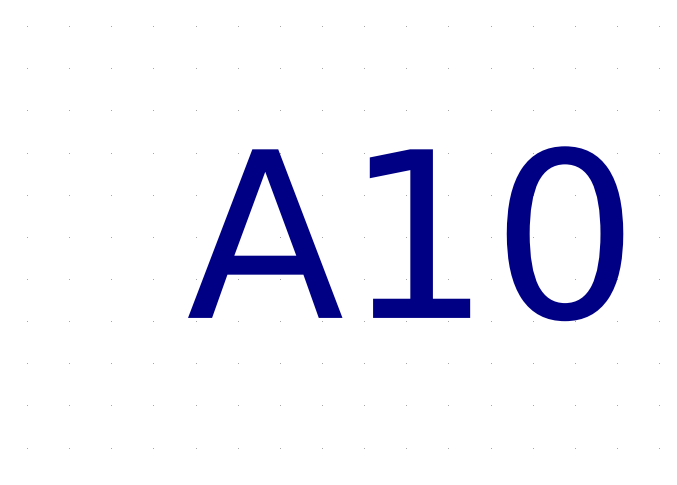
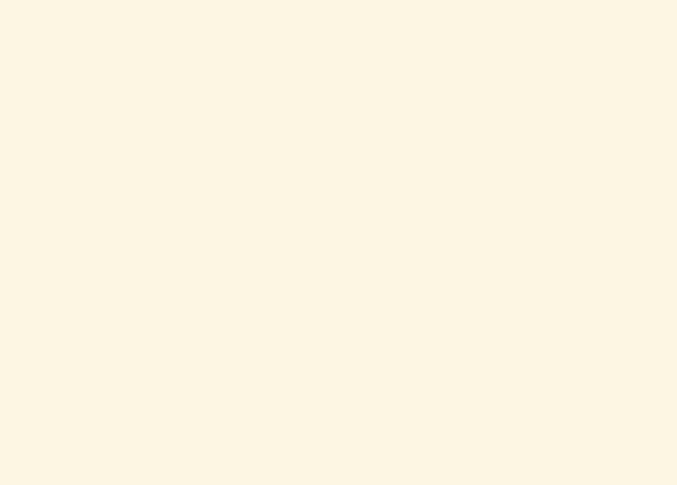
text: A10 (405, 233) -> none

